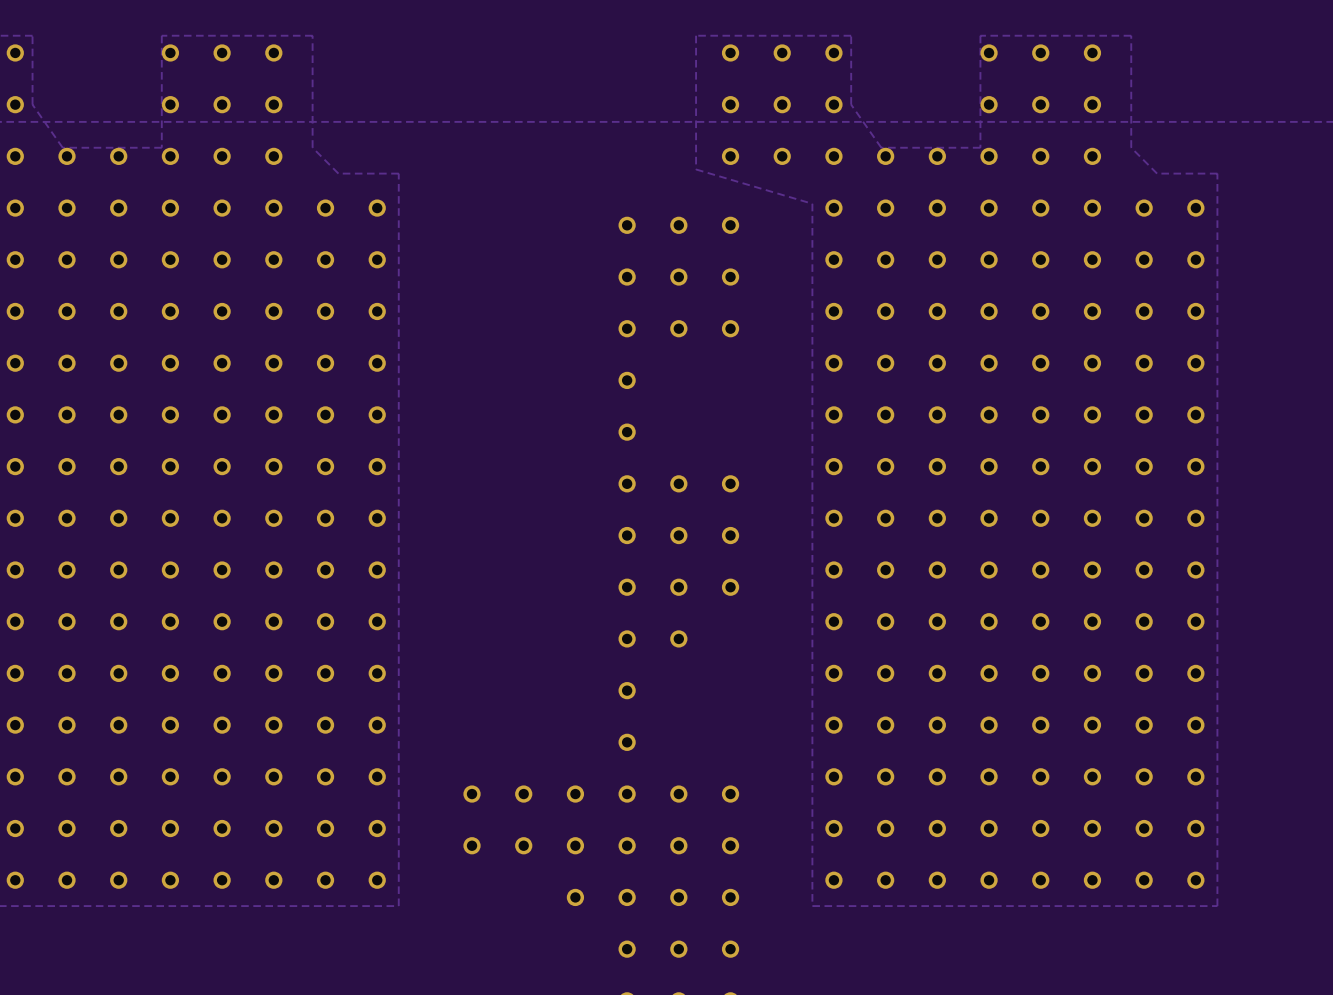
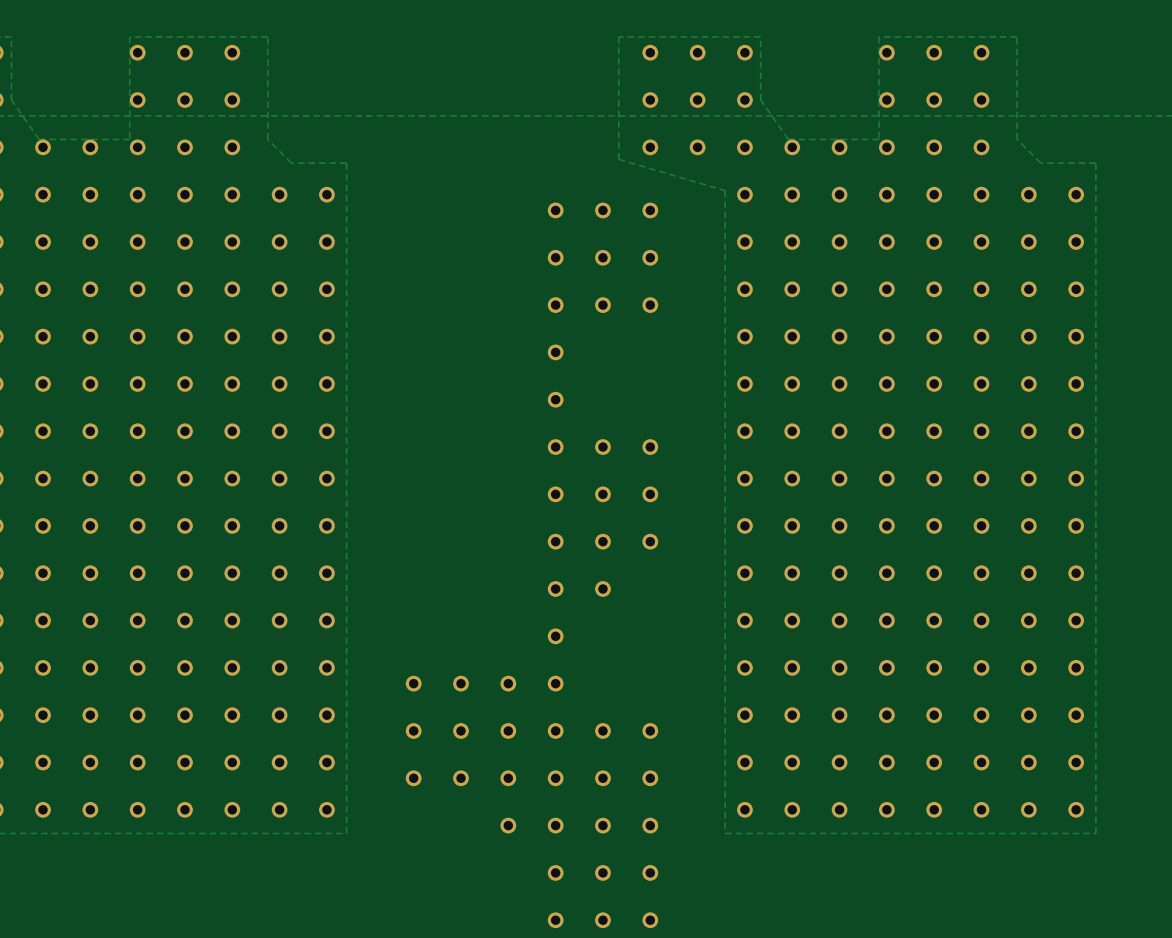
via: none -> (413, 683)
via: none -> (461, 683)
via: none -> (508, 683)

